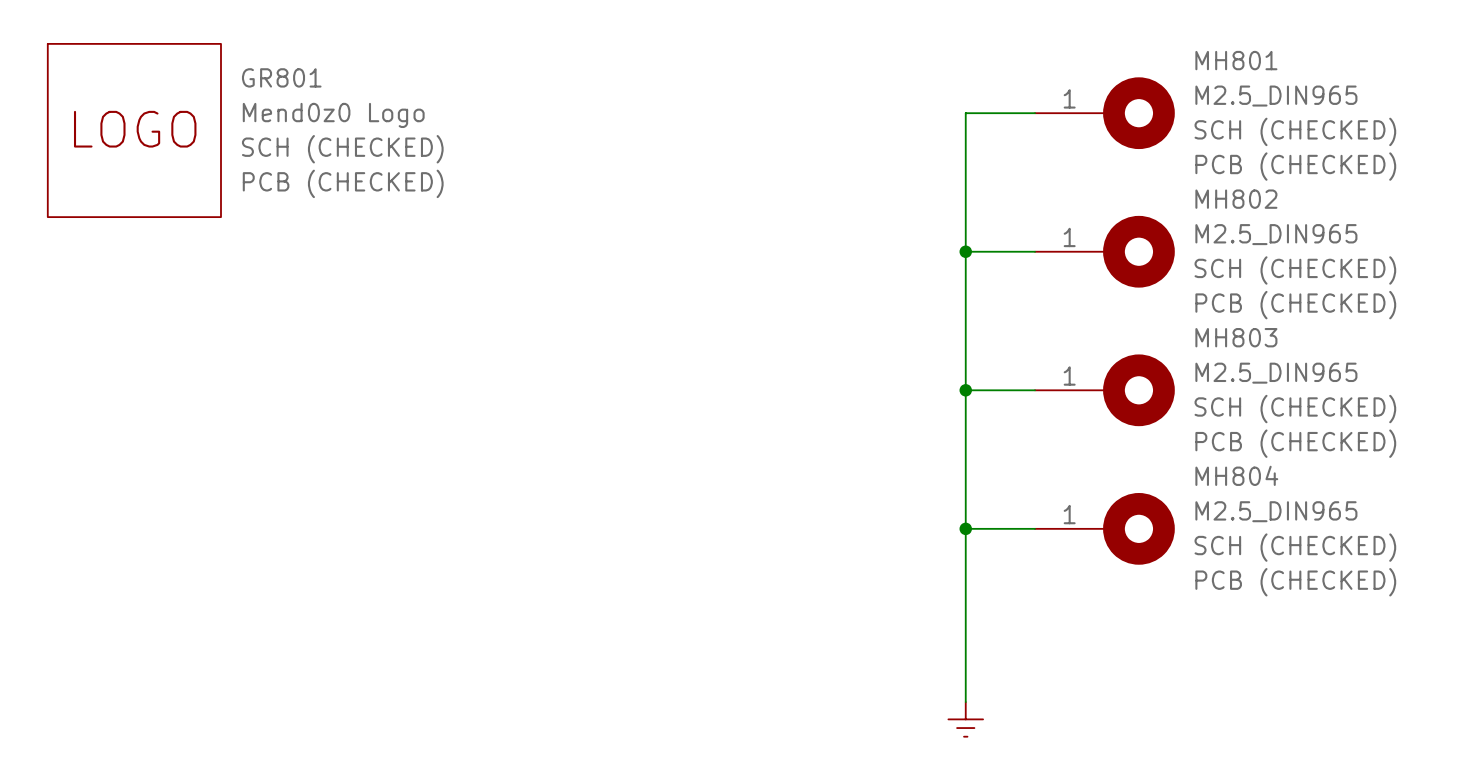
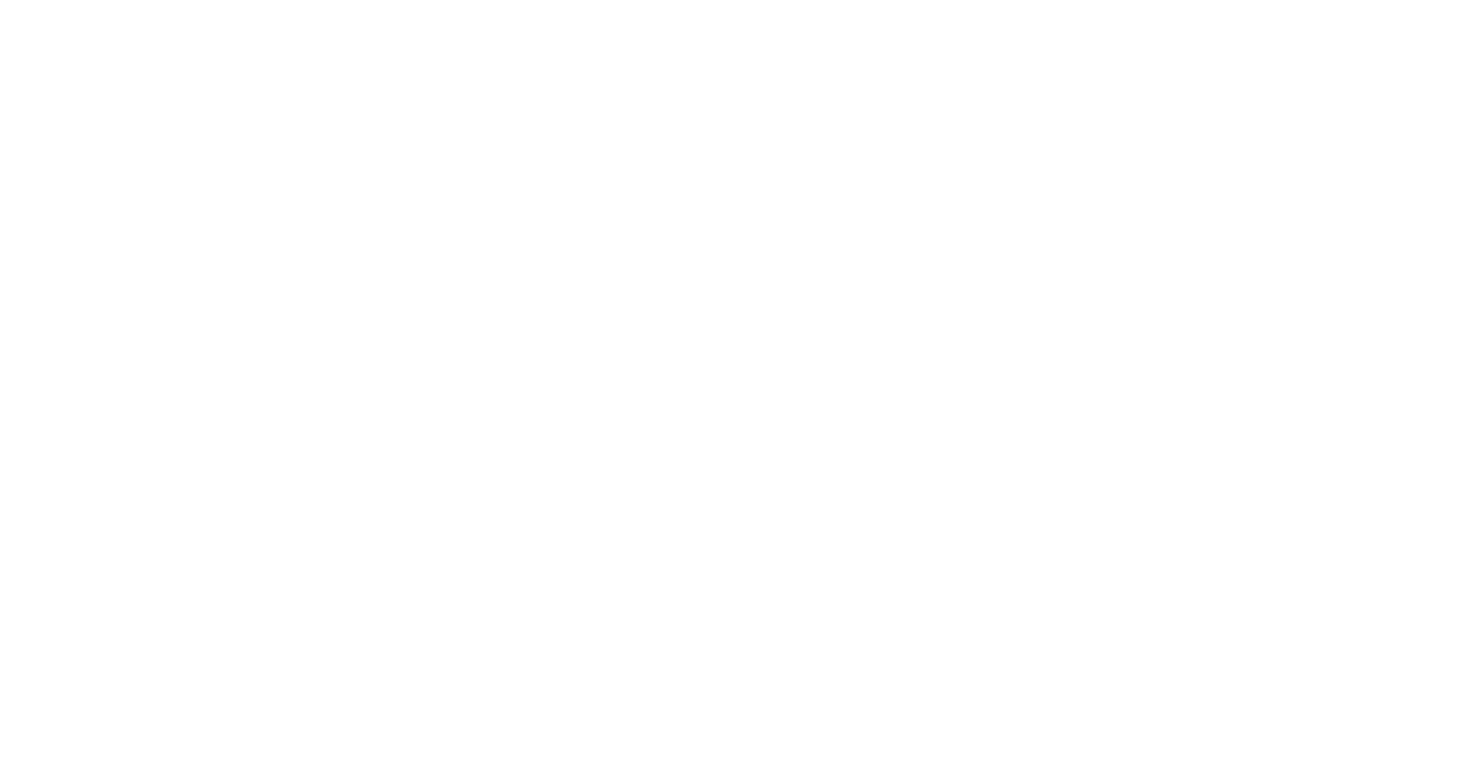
wire: (1035, 113) (965, 113) (965, 702) -> none
MH801: M2.5_DIN965 (1104, 113) -> none
GR801: Mend0z0 Logo (134, 130) -> none
wire: (965, 251) (1035, 251) -> none
junction: (965, 251) -> none
MH802: M2.5_DIN965 (1104, 251) -> none
wire: (965, 390) (1035, 390) -> none
junction: (965, 390) -> none
MH803: M2.5_DIN965 (1104, 390) -> none
wire: (965, 528) (1035, 528) -> none
junction: (965, 528) -> none
MH804: M2.5_DIN965 (1104, 528) -> none
power symbol: (965, 719) -> none

